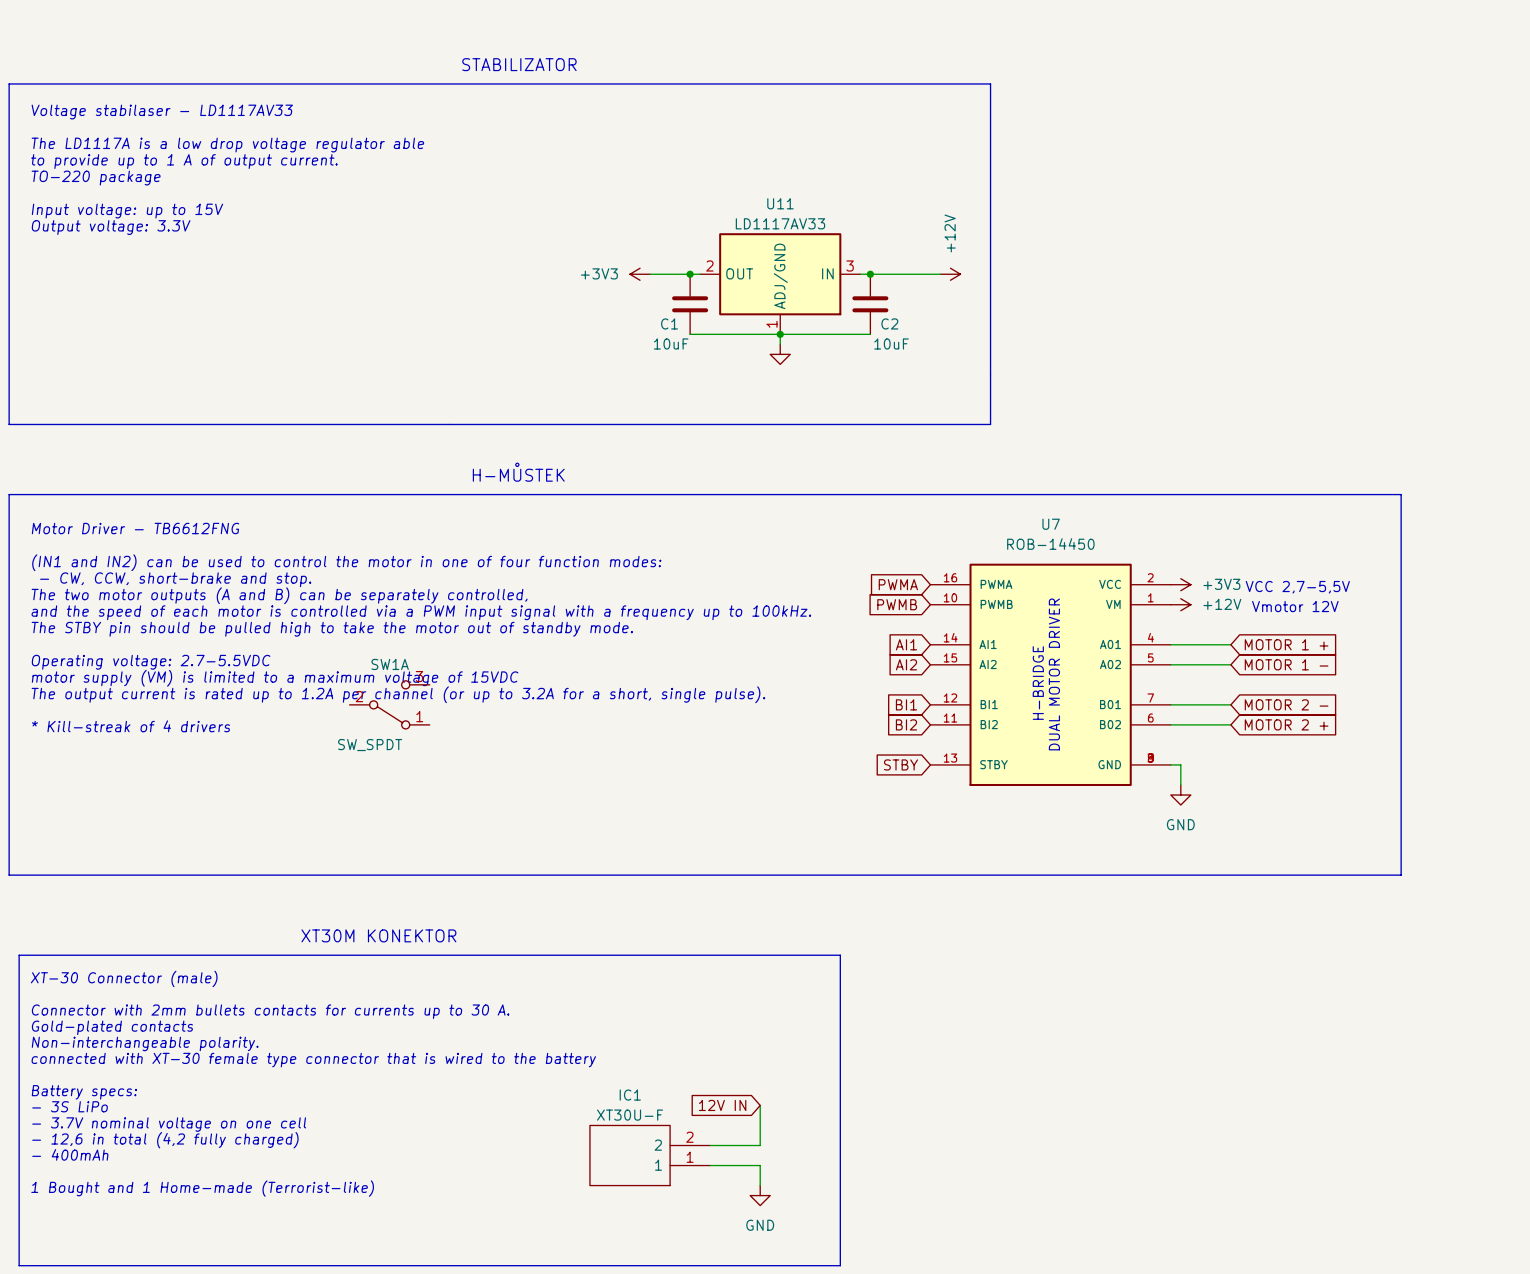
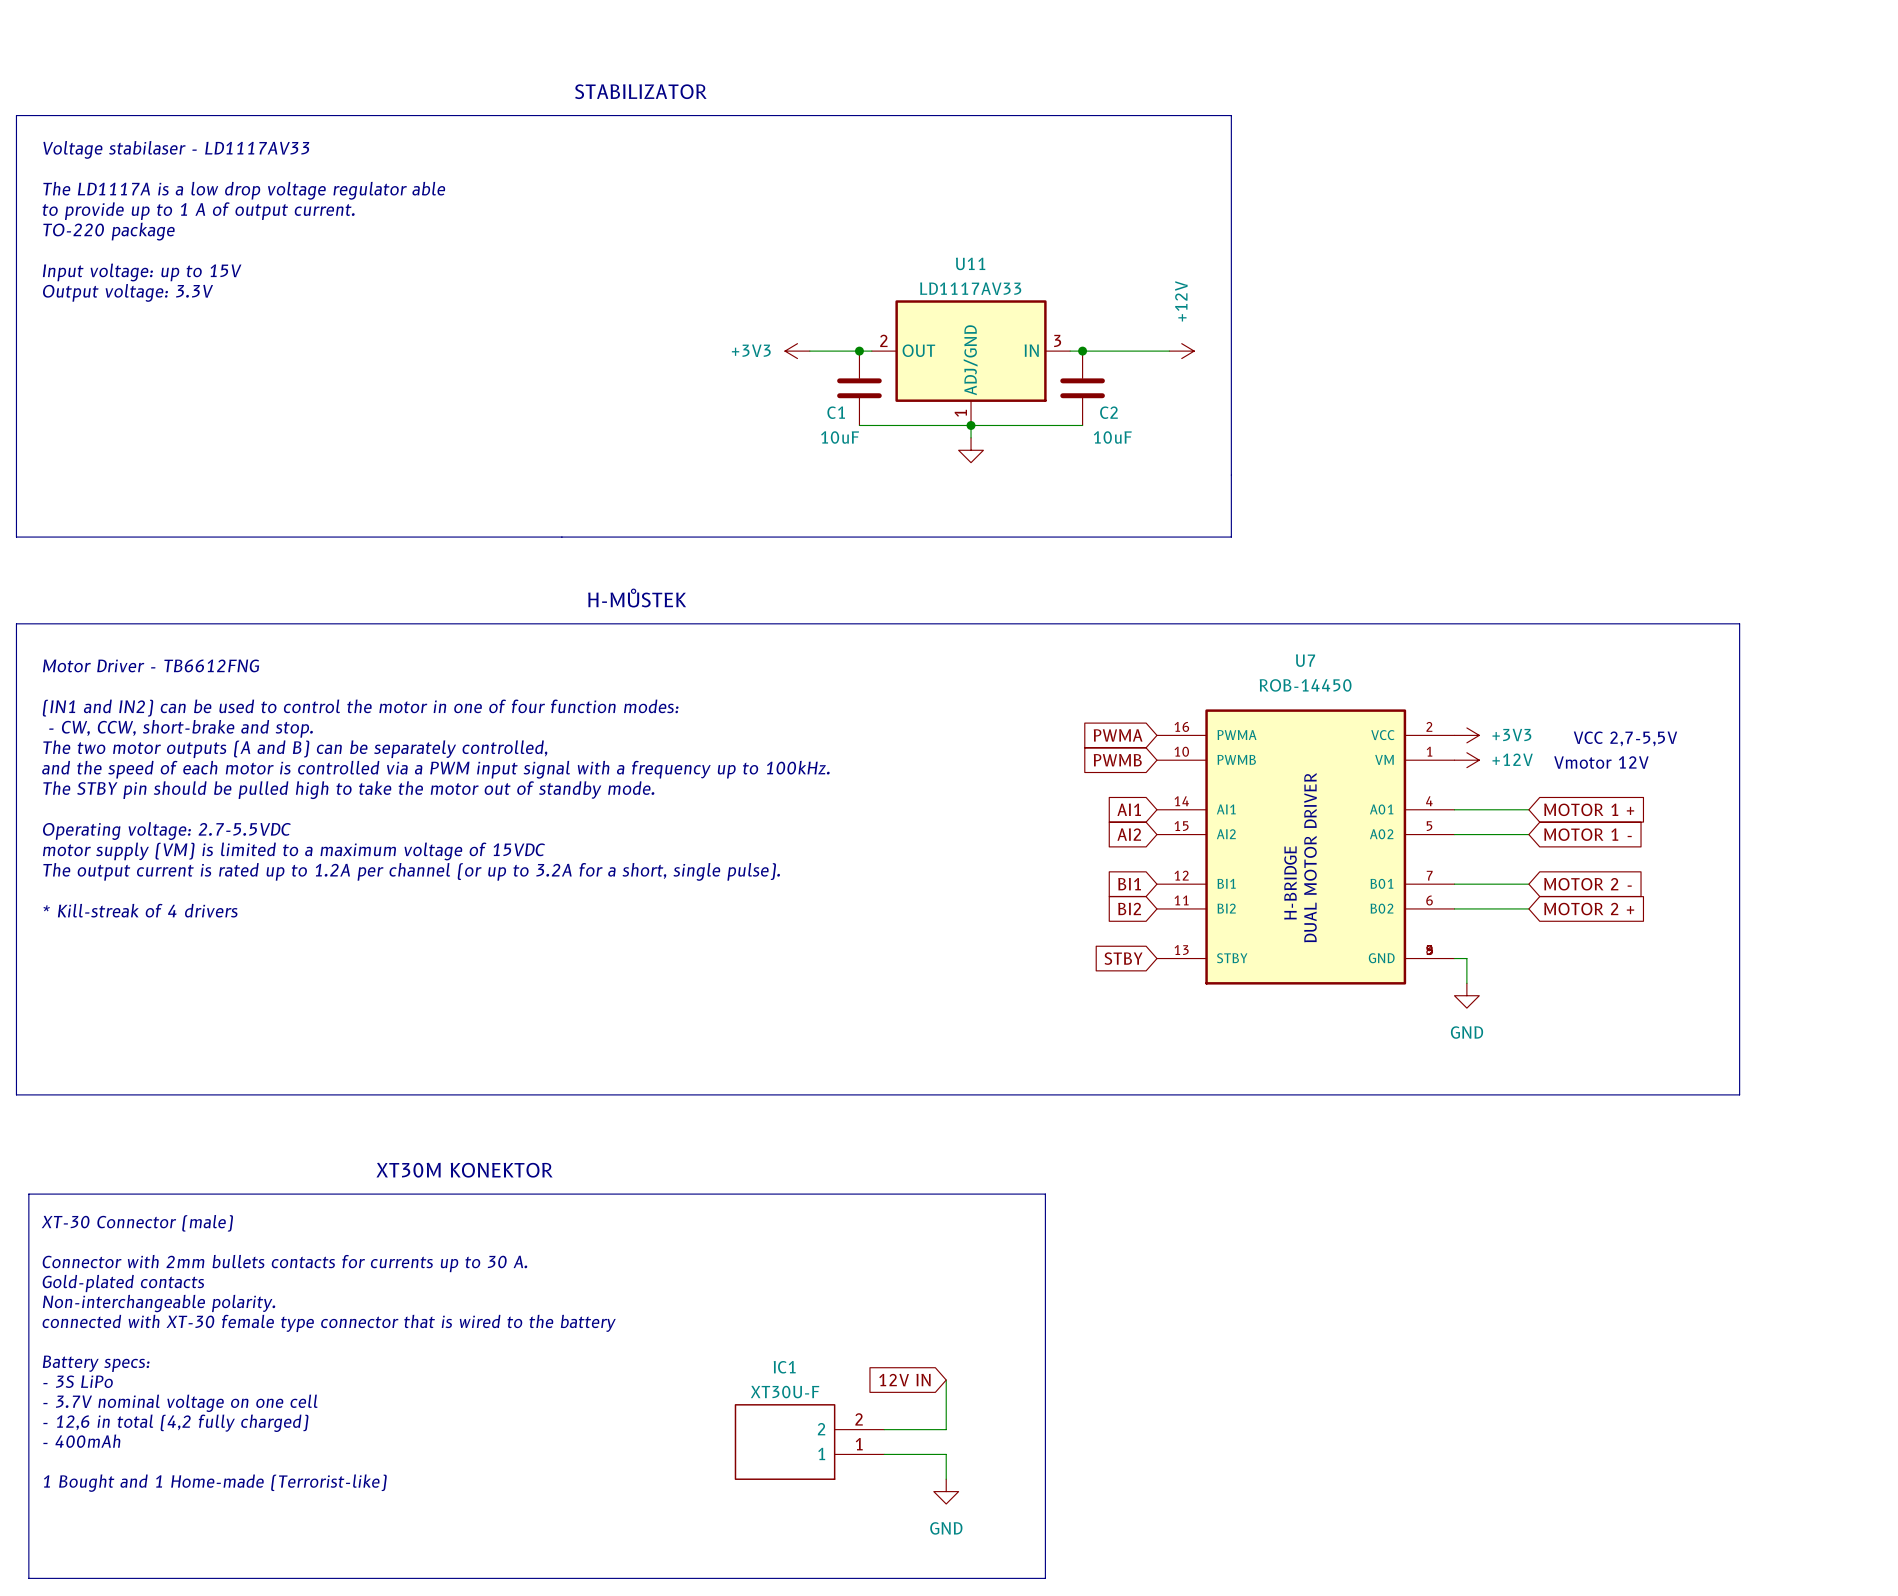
SW1A: SW_SPDT (389, 704) -> none

